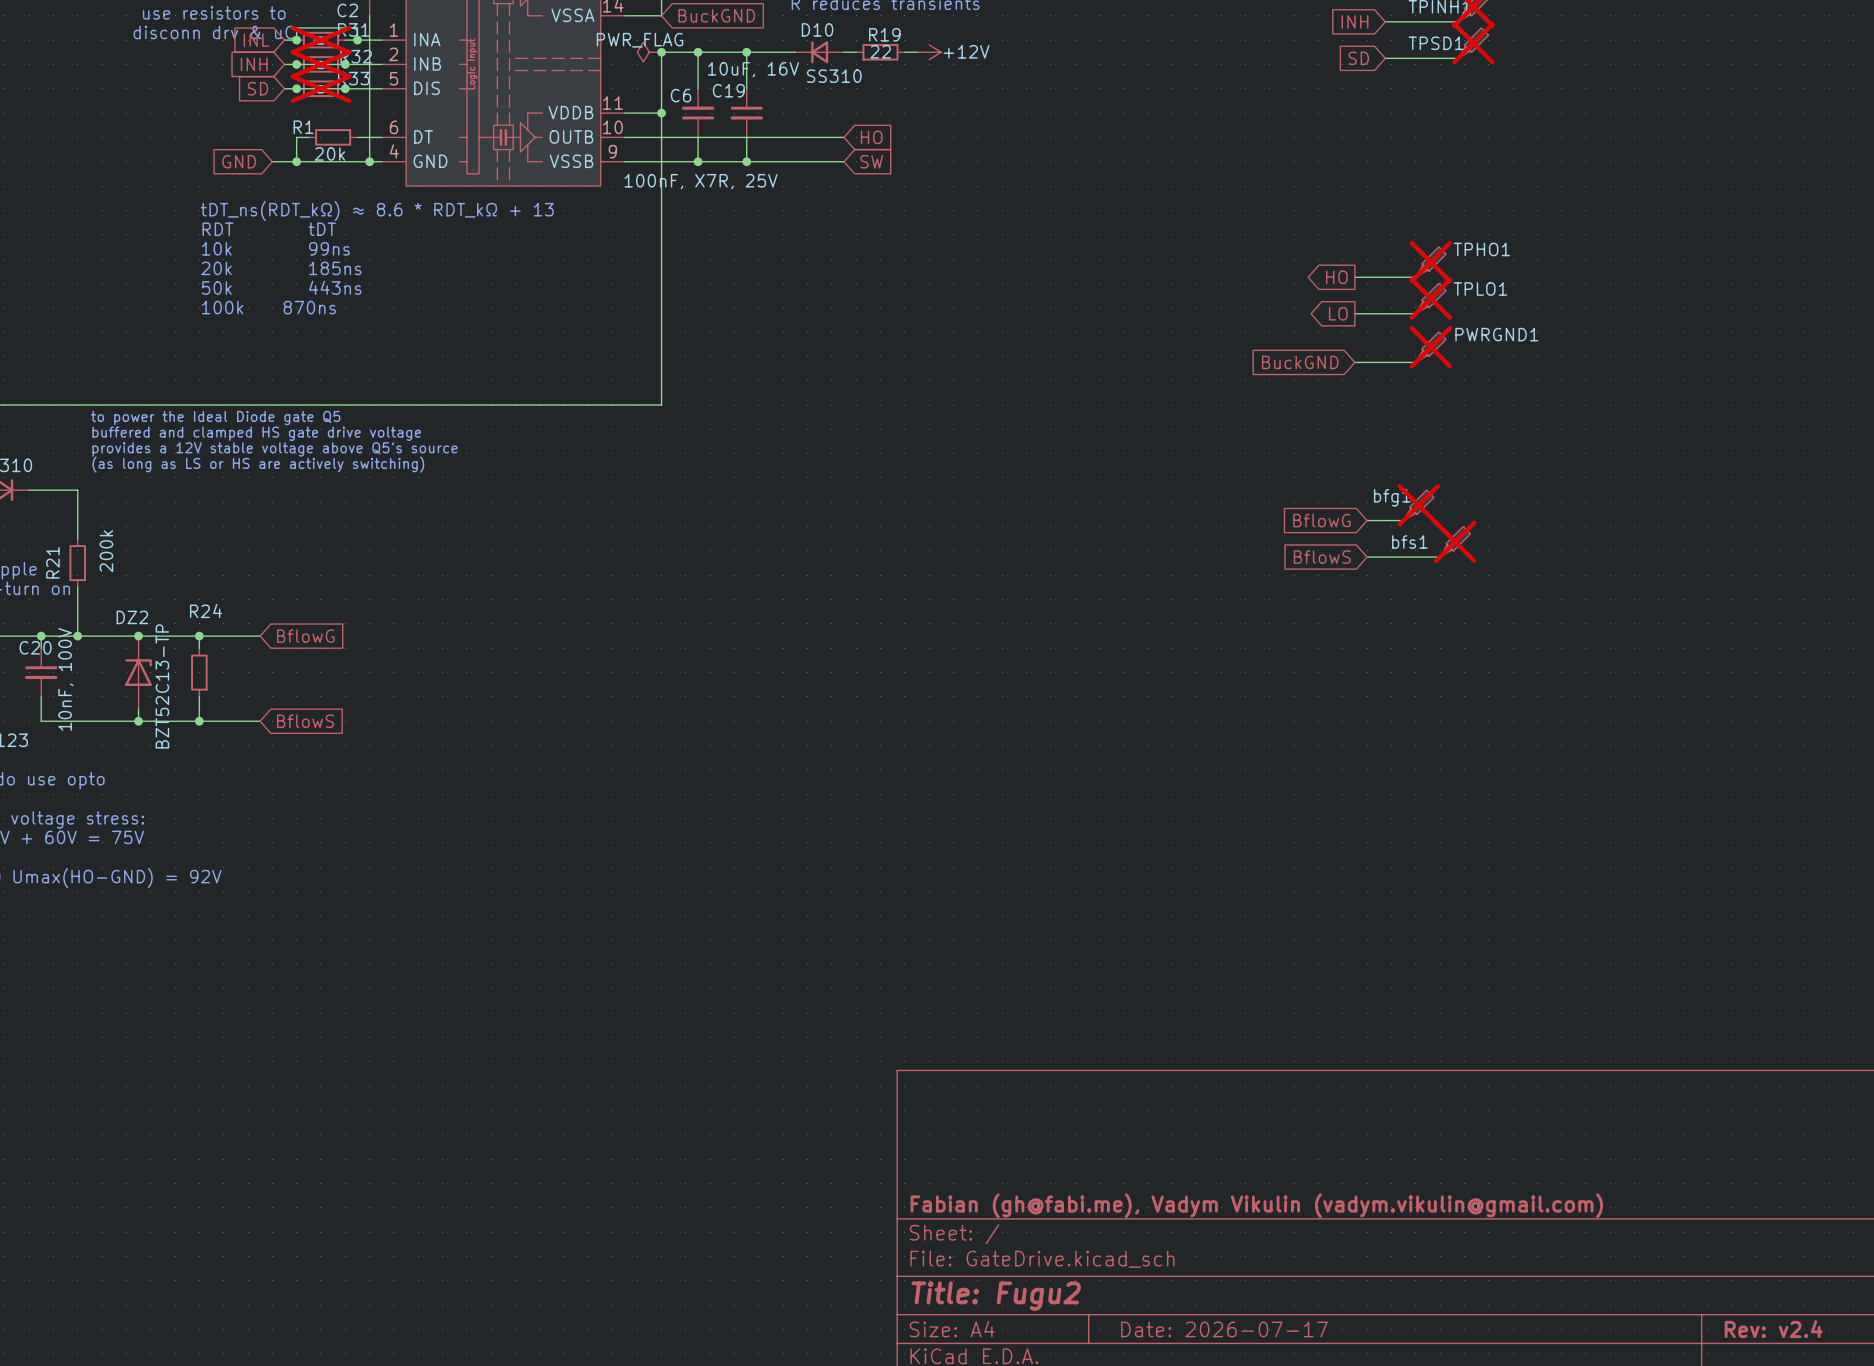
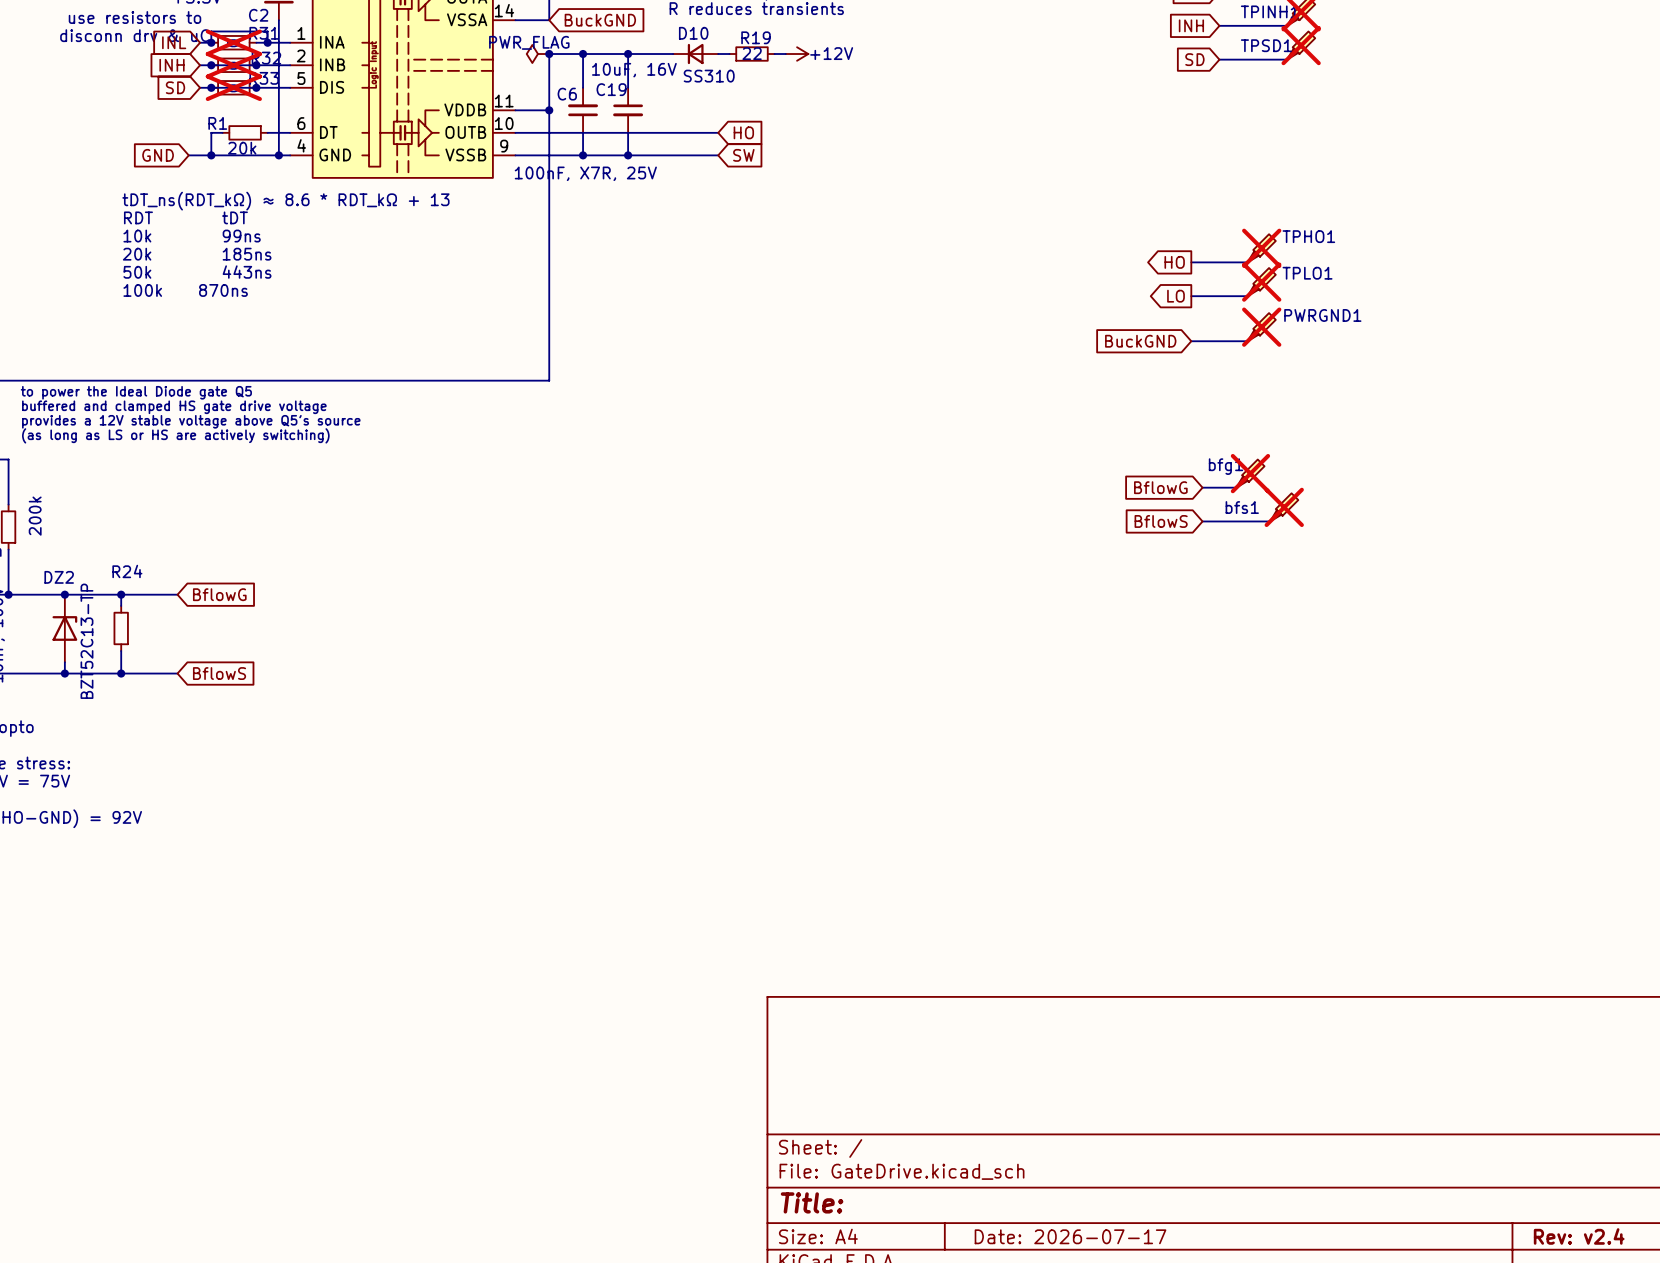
title block: Fabian (gh@fabi.me), Vadym Vikulin (vadym.vikulin@gmail.com) (1256, 1205) -> none
title block: Title: Fugu2 (996, 1296) -> Title: (812, 1202)

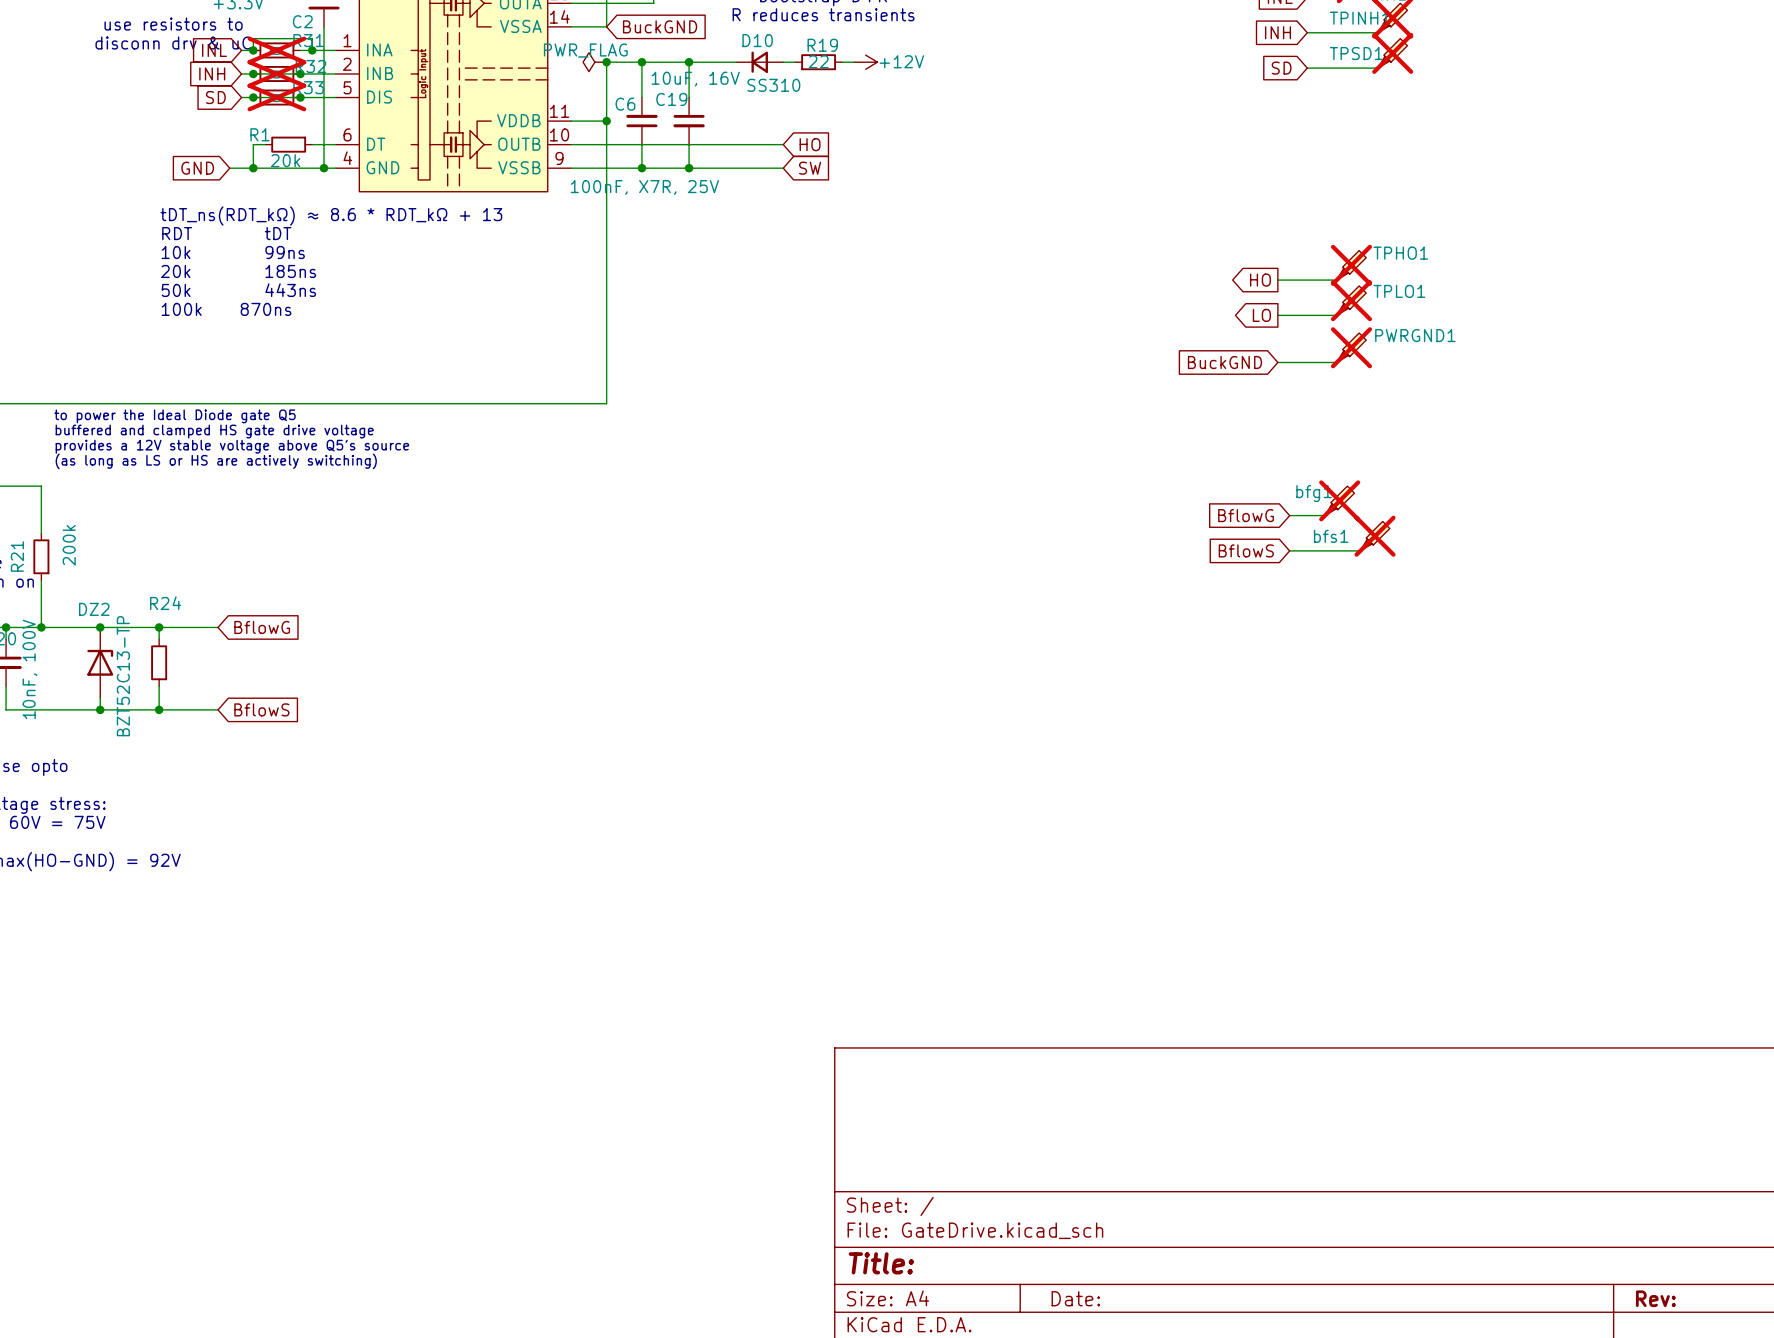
title block: Date: 2026-07-17 (1070, 1236) -> Date: (1075, 1298)
title block: Rev: v2.4 (1579, 1236) -> Rev: (1655, 1298)

